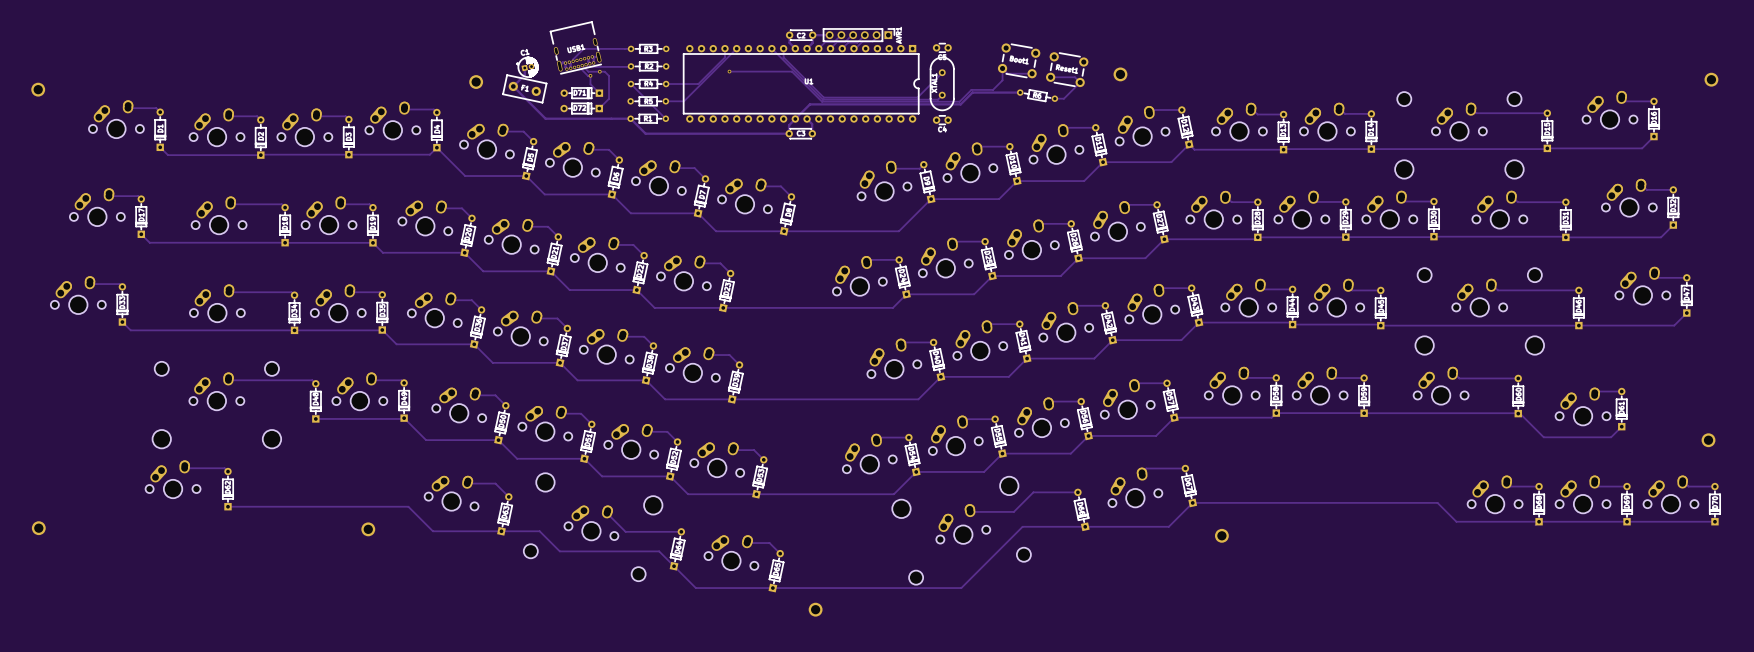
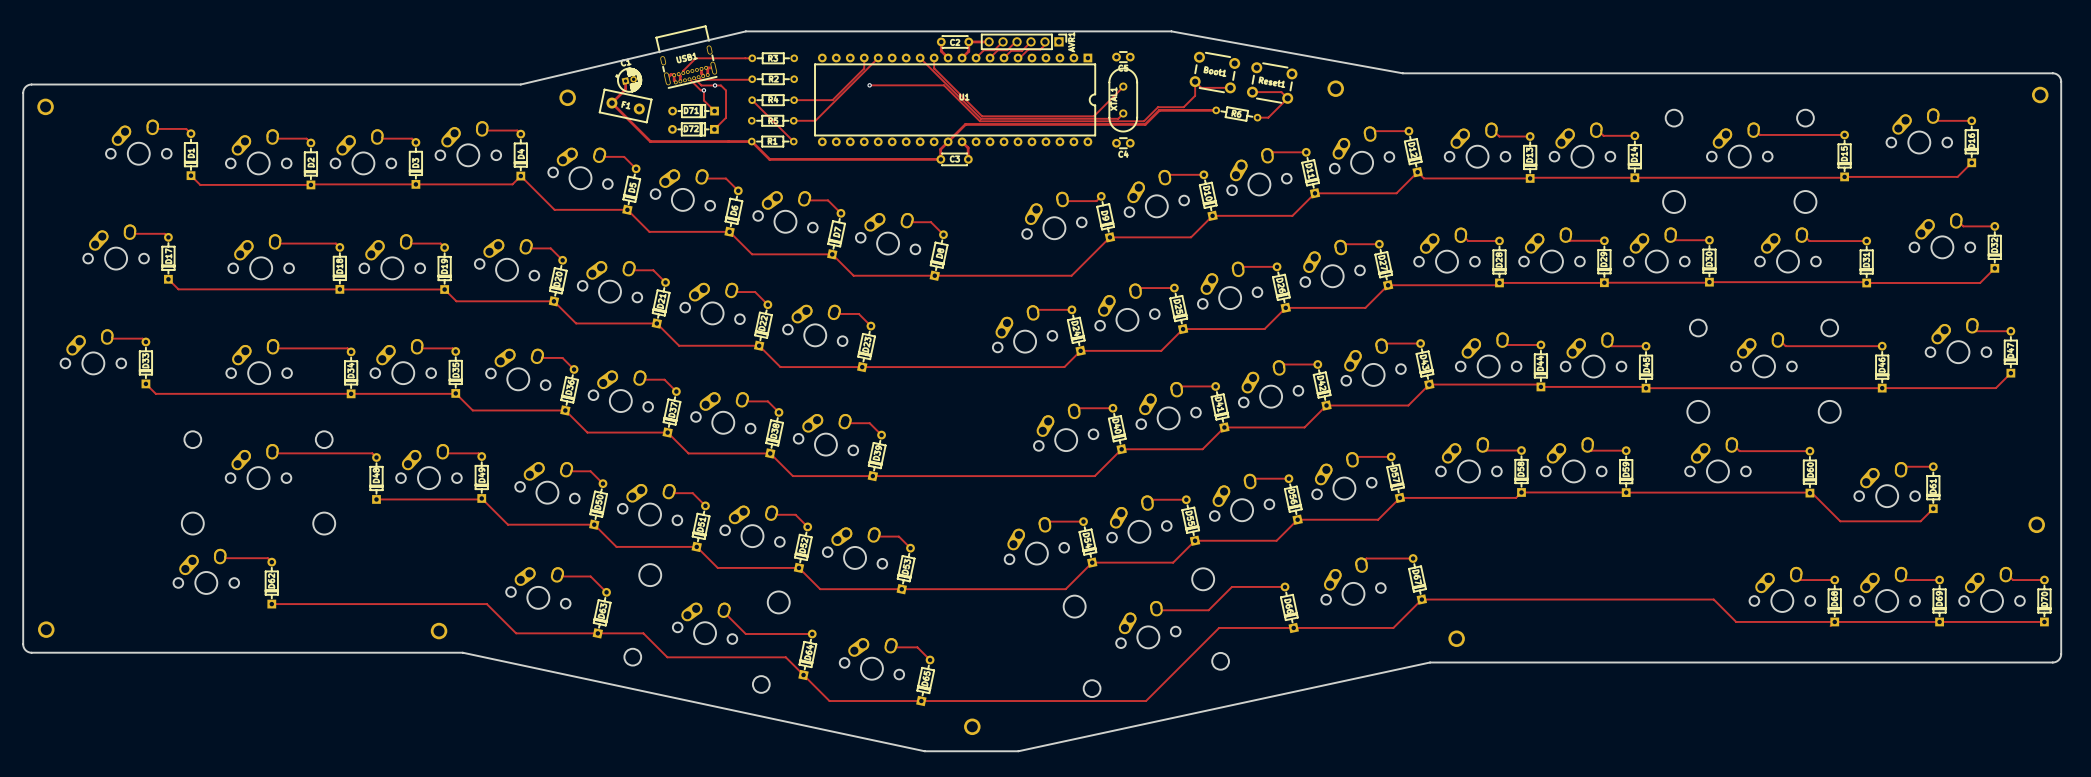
board edge: none -> (745, 31) (520, 84) (31, 84) (26, 86) (23, 92) (23, 644) (24, 649) (31, 652) (462, 652) (924, 751) (1018, 751) (1430, 662) (2052, 662) (2060, 657) (2061, 81) (2056, 73) (1402, 73) (1171, 31) (745, 31)

